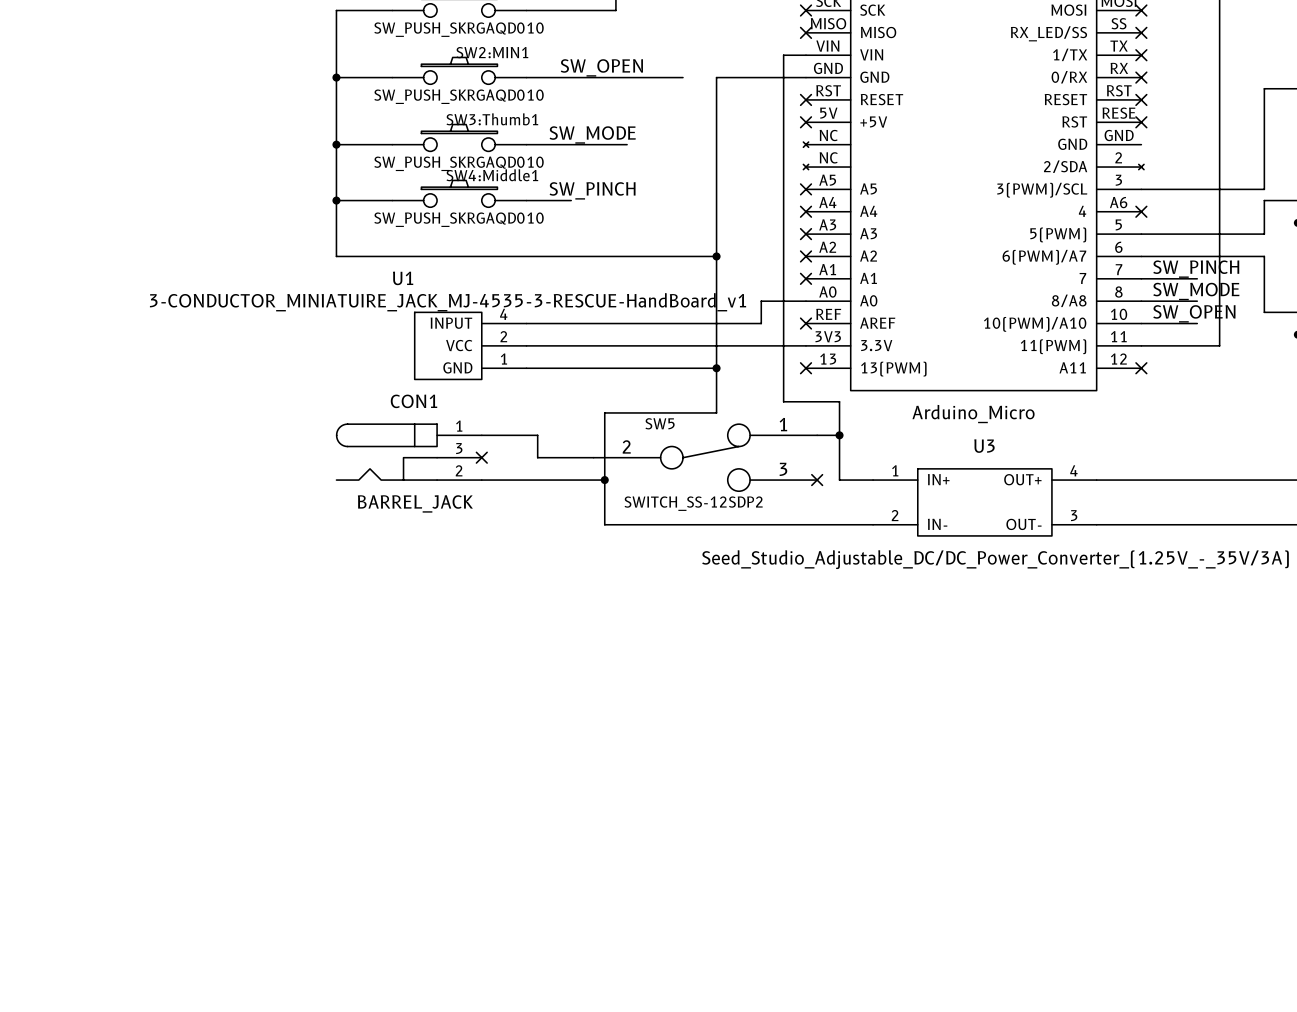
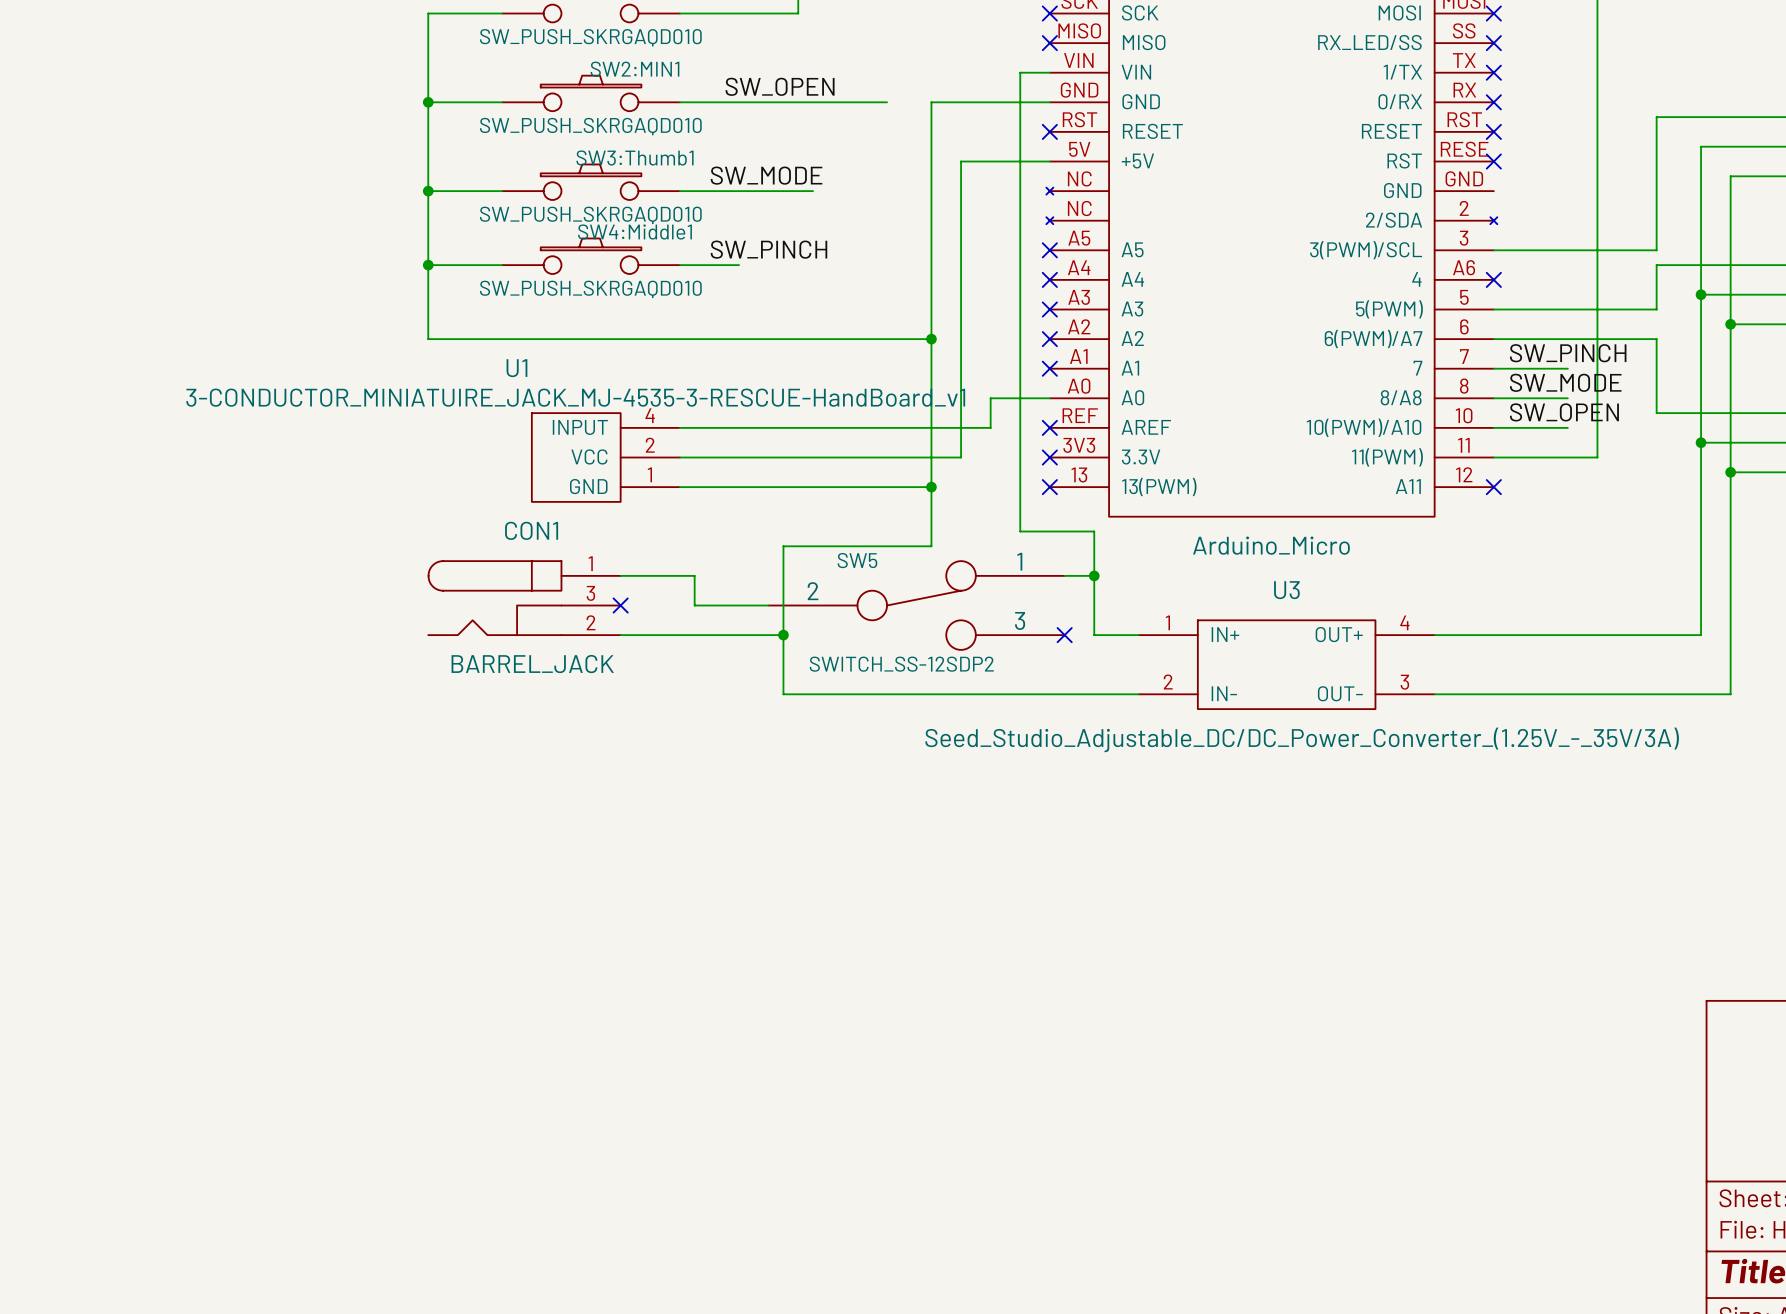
no-connect mark: (805, 122) -> none
wire: (738, 345) (805, 345) -> (961, 457) (961, 161) (1049, 161)
no-connect mark: none -> (1049, 457)

